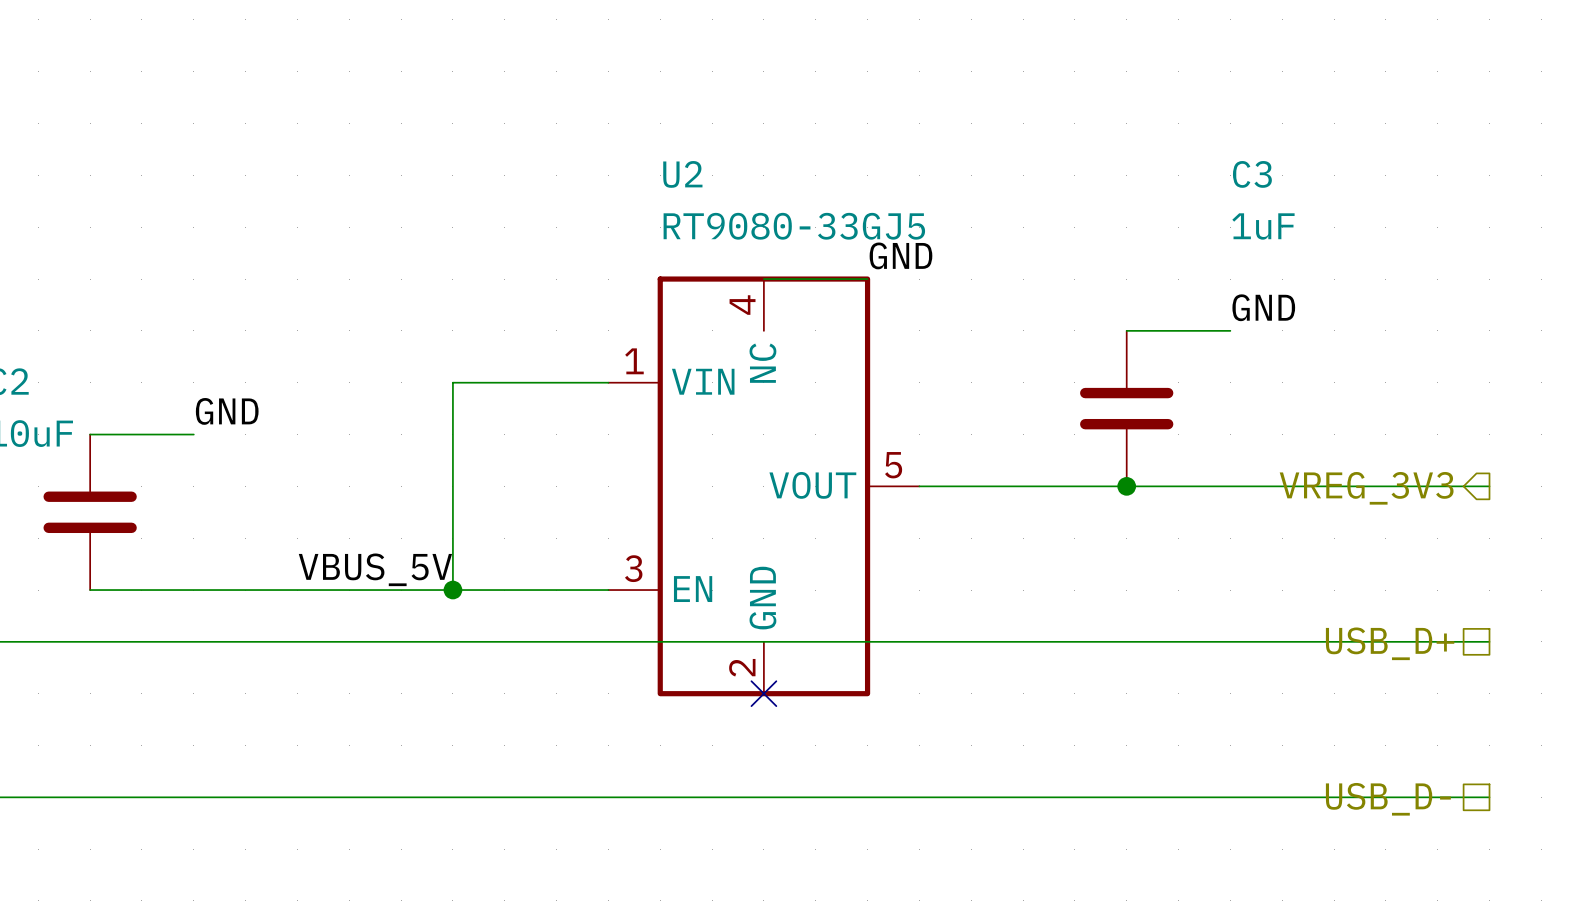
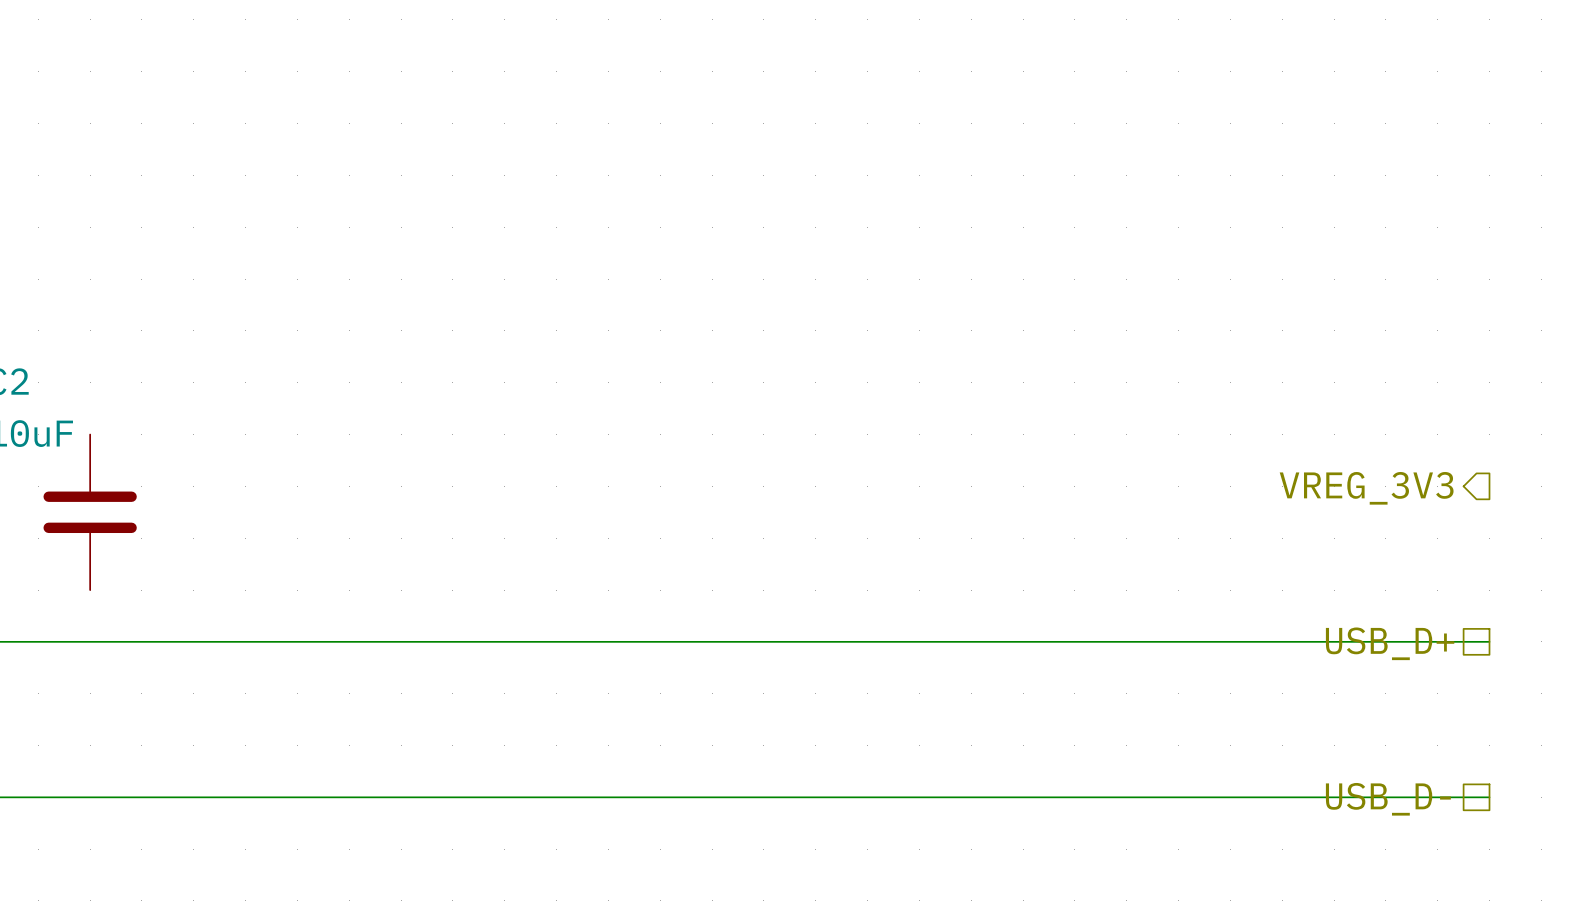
label: GND (900, 255) -> none
wire: (763, 279) (867, 279) -> none
label: GND (1263, 307) -> none
wire: (1126, 330) (1230, 330) -> none
wire: (608, 382) (452, 382) (452, 590) -> none
C3: 1uF (1126, 408) -> none
label: GND (227, 411) -> none
wire: (90, 434) (193, 434) -> none
U2: RT9080-33GJ5 (763, 486) -> none
wire: (919, 486) (1489, 486) -> none
junction: (1126, 486) -> none
label: VBUS_5V (375, 569) -> none
wire: (90, 590) (608, 590) -> none
junction: (452, 590) -> none
no-connect mark: (763, 693) -> none

